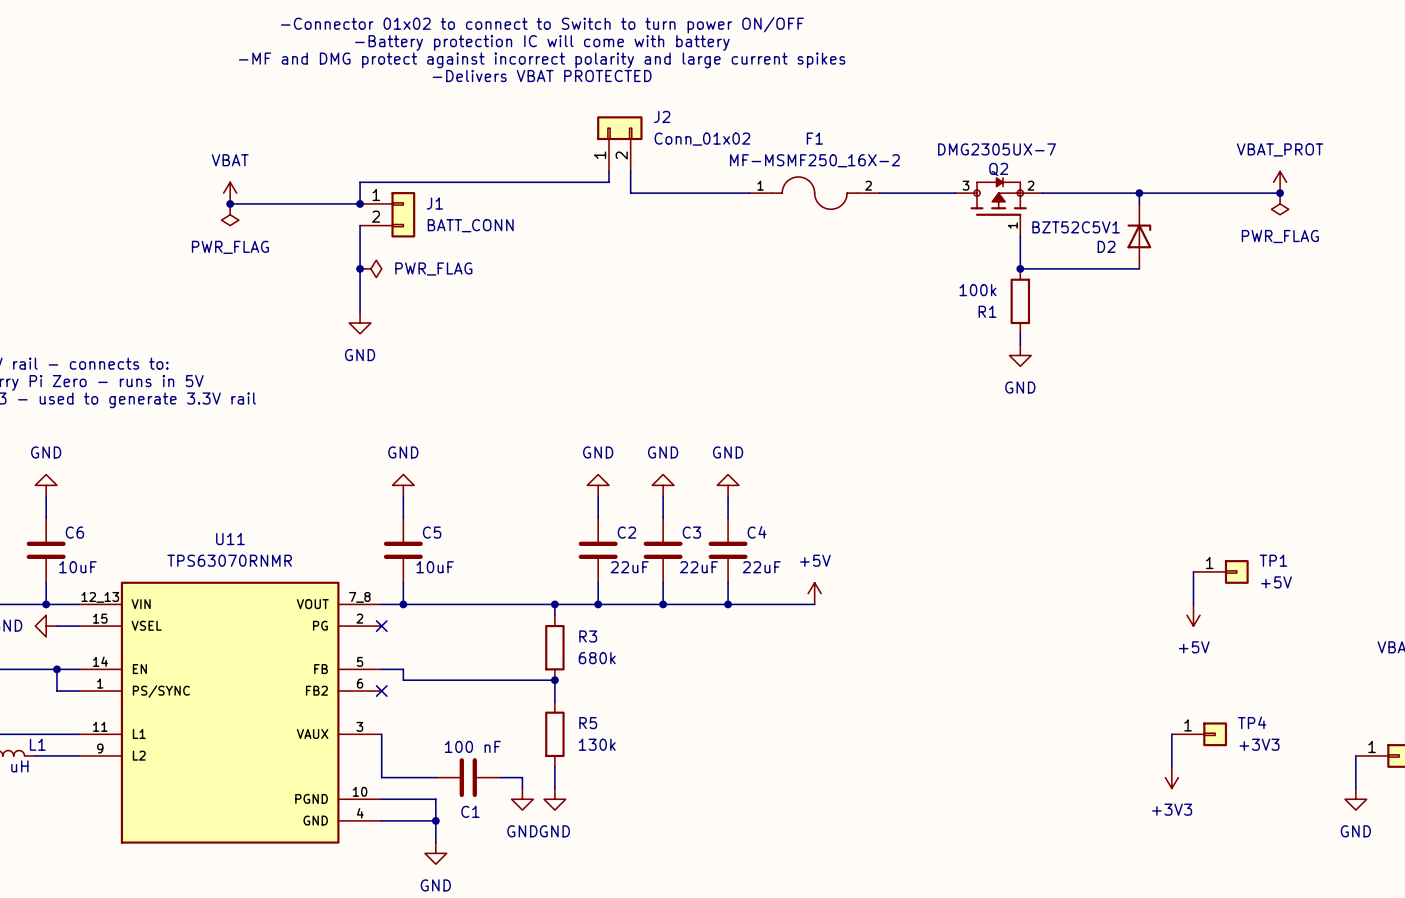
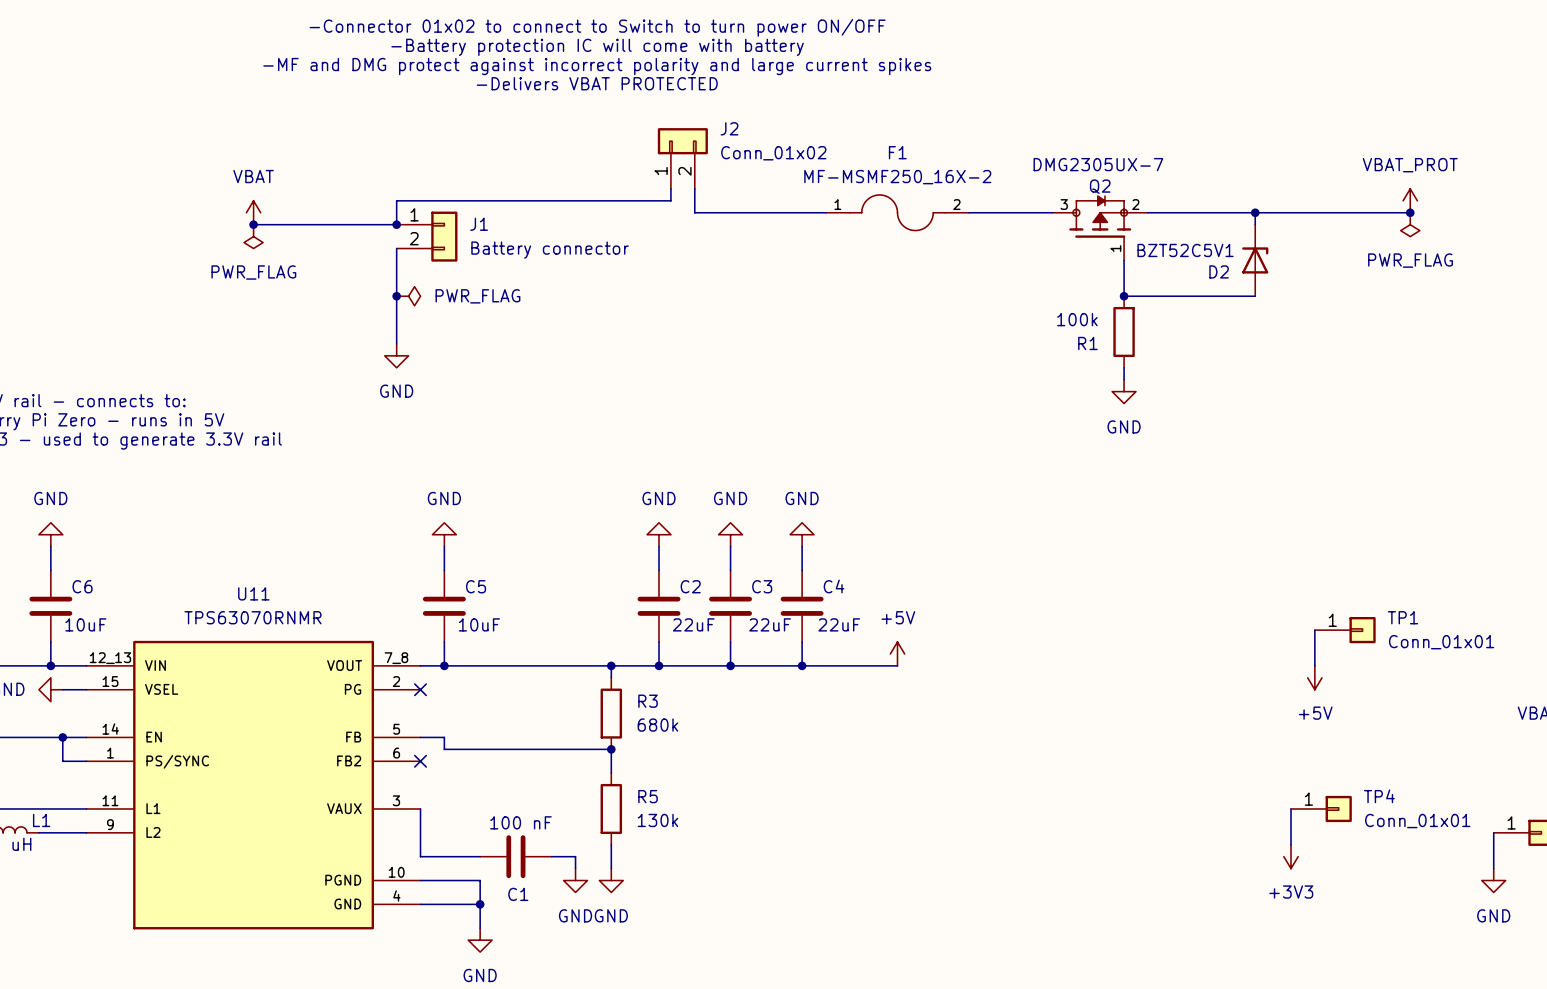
J1 value: BATT_CONN (470, 225) -> Battery connector (550, 250)
TP1 value: +5V (1276, 582) -> Conn_01x01 (1441, 642)
TP4 value: +3V3 (1259, 744) -> Conn_01x01 (1417, 821)

